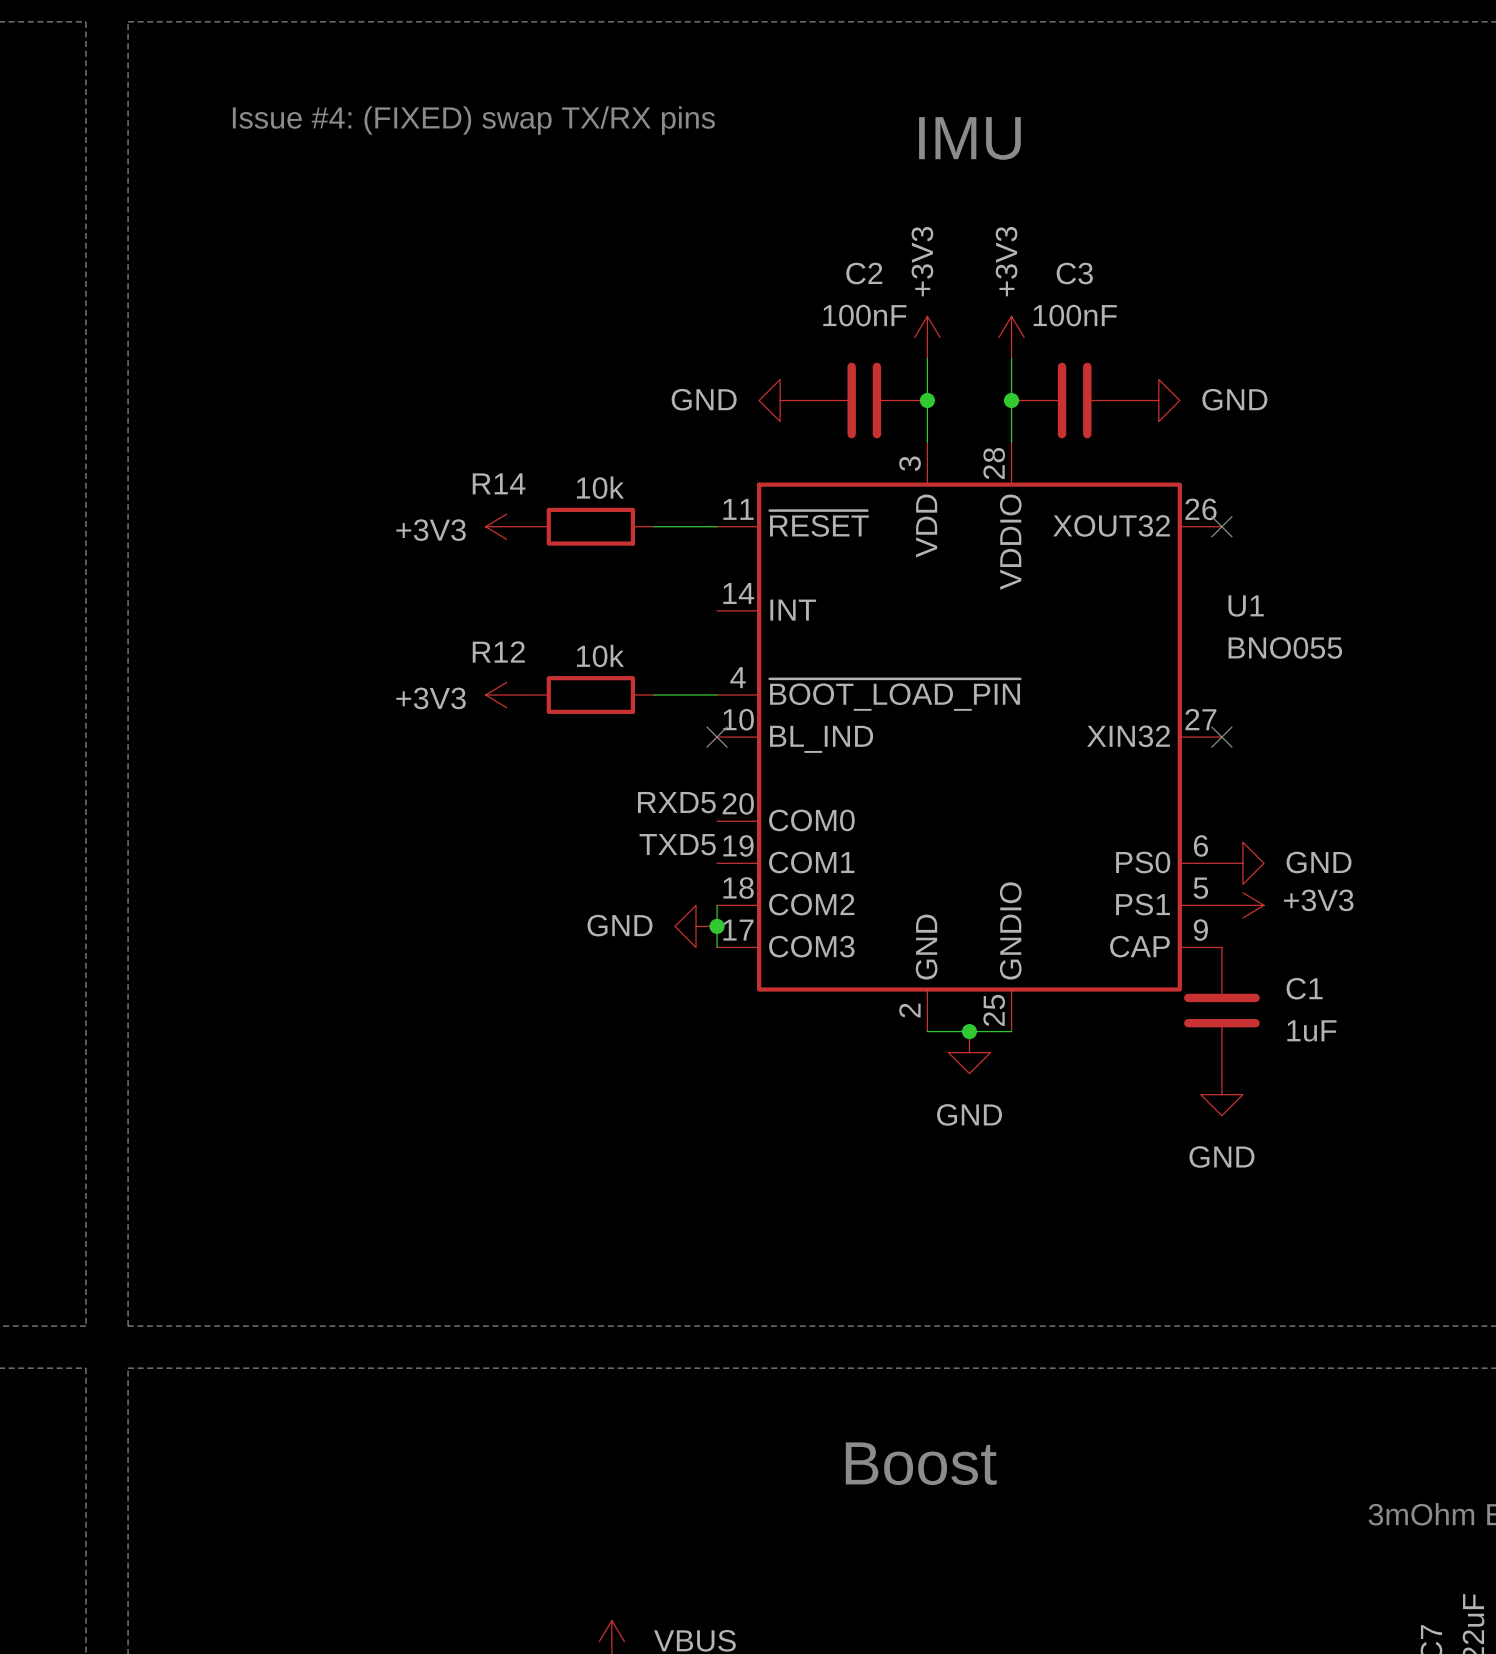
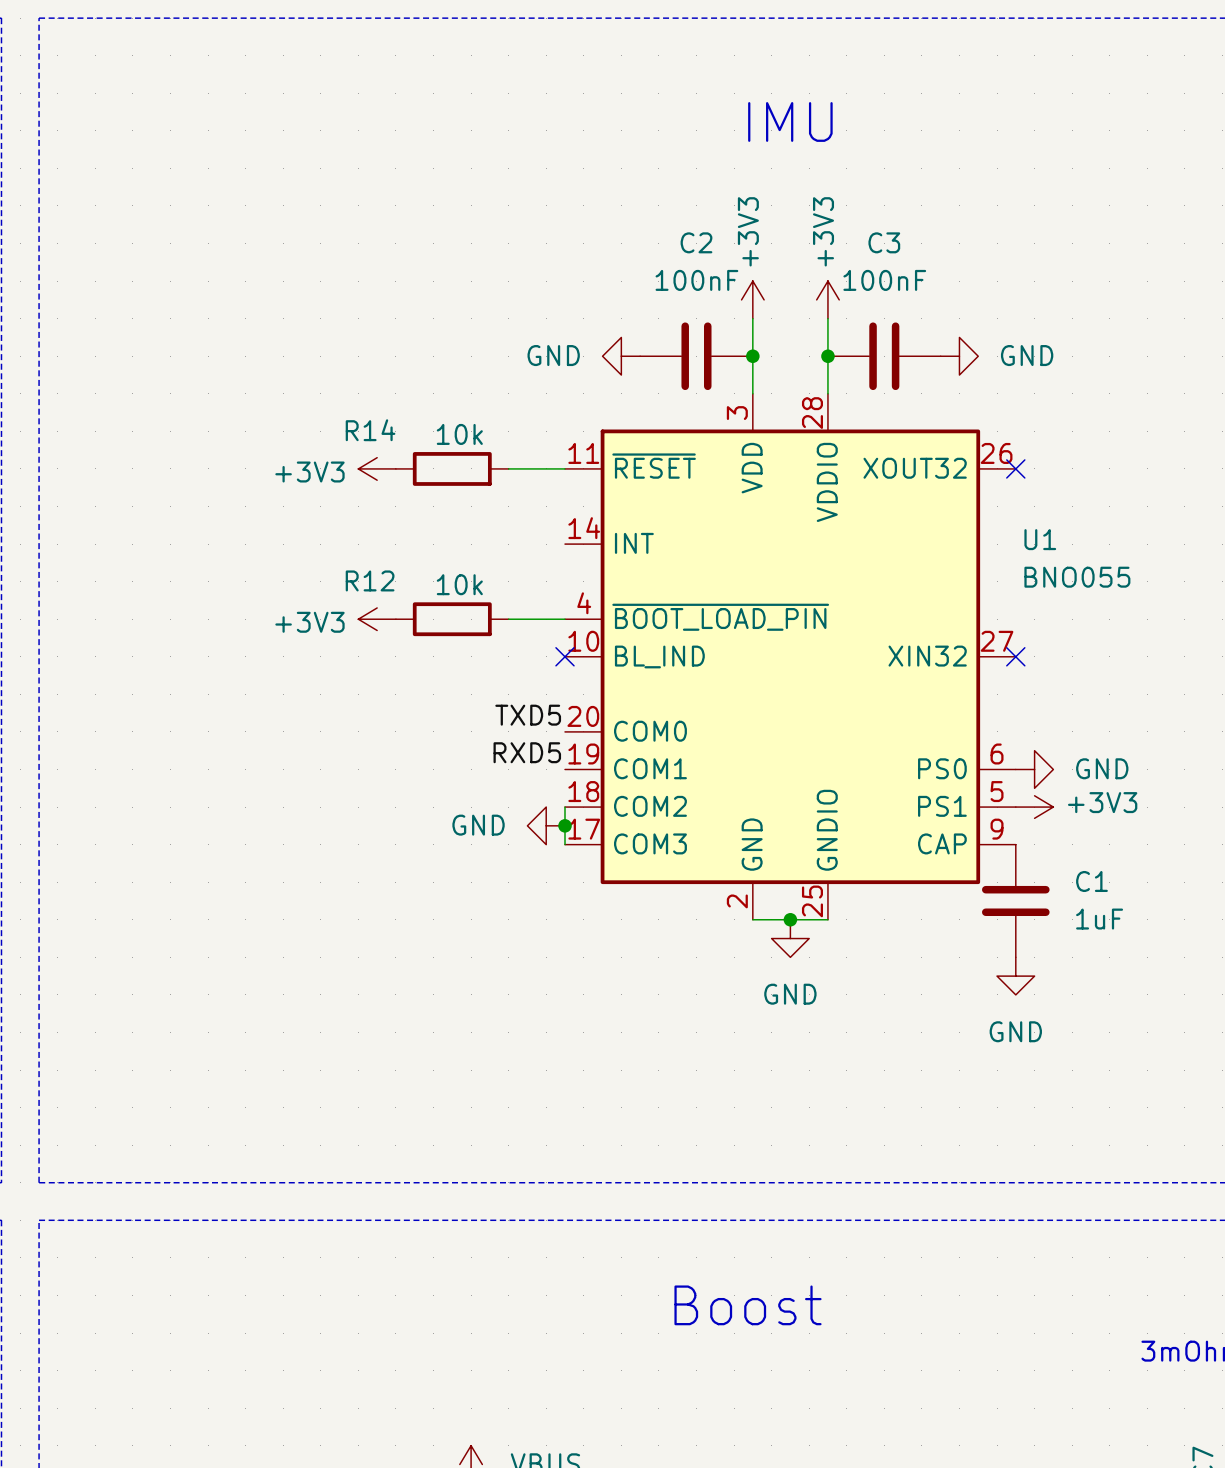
text: Issue #4: (FIXED) swap TX/RX pins (473, 120) -> none
label: RXD5 (676, 802) -> TXD5 (528, 715)
label: TXD5 (677, 844) -> RXD5 (527, 752)

